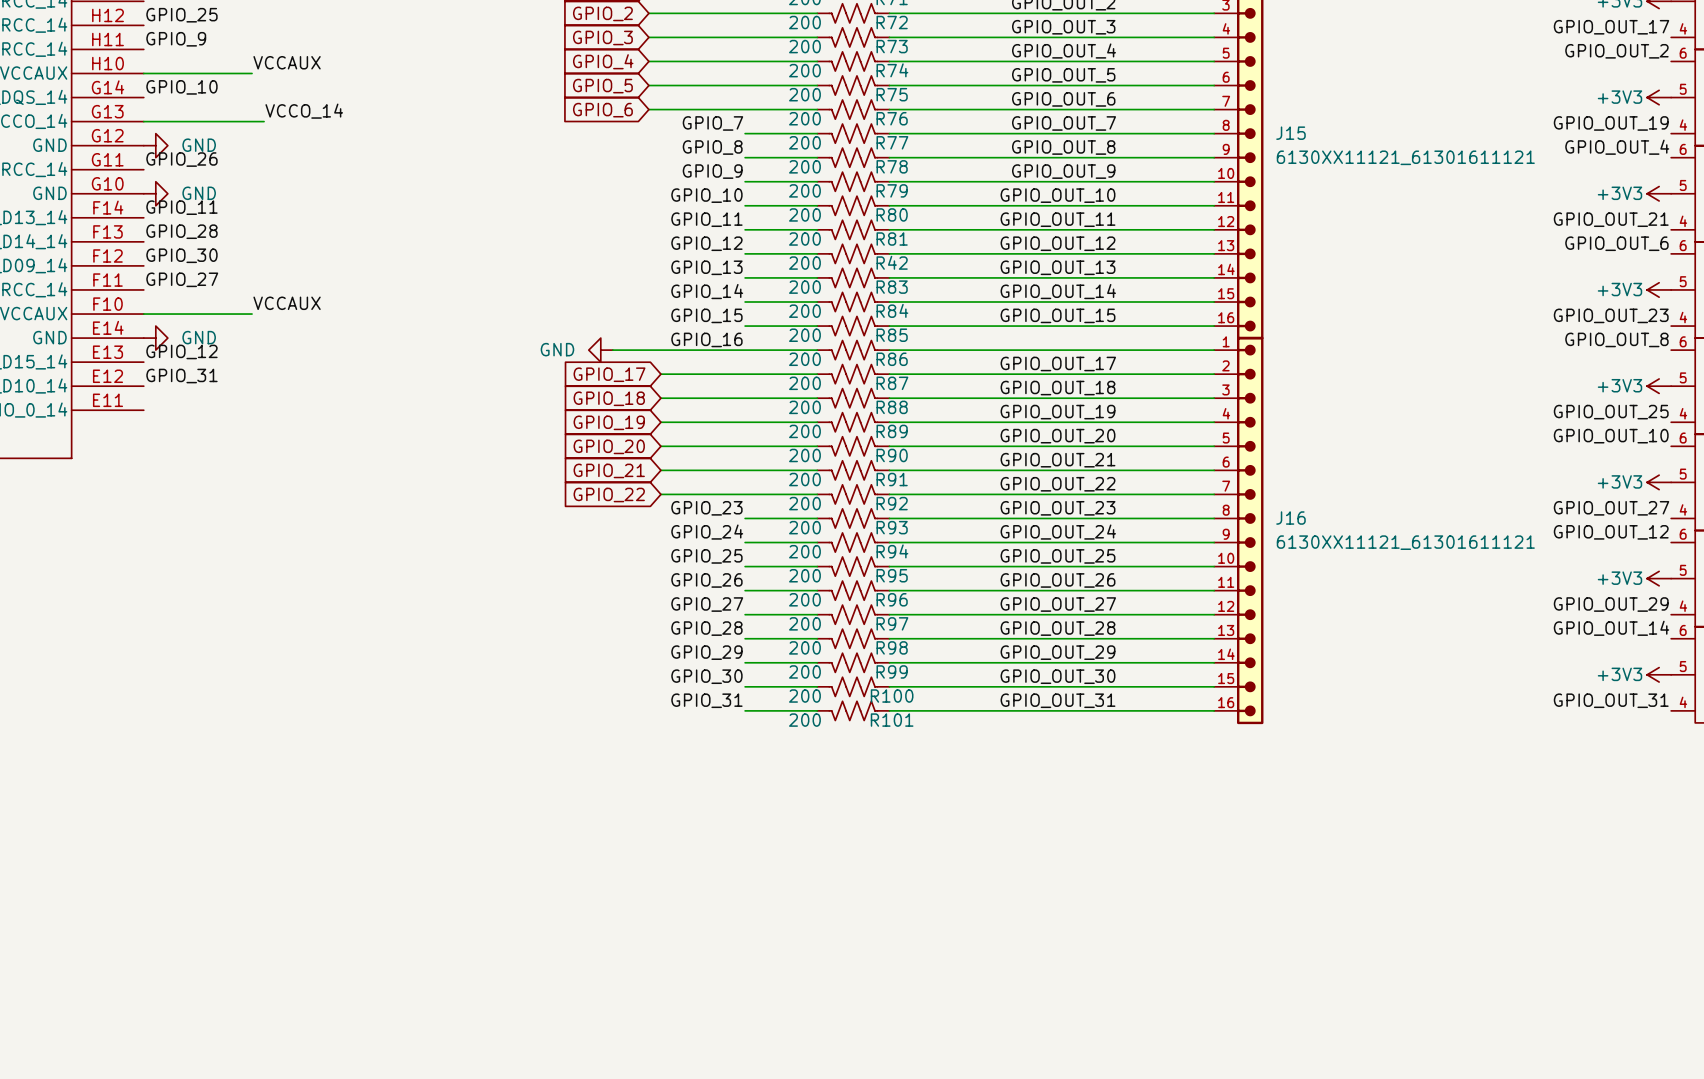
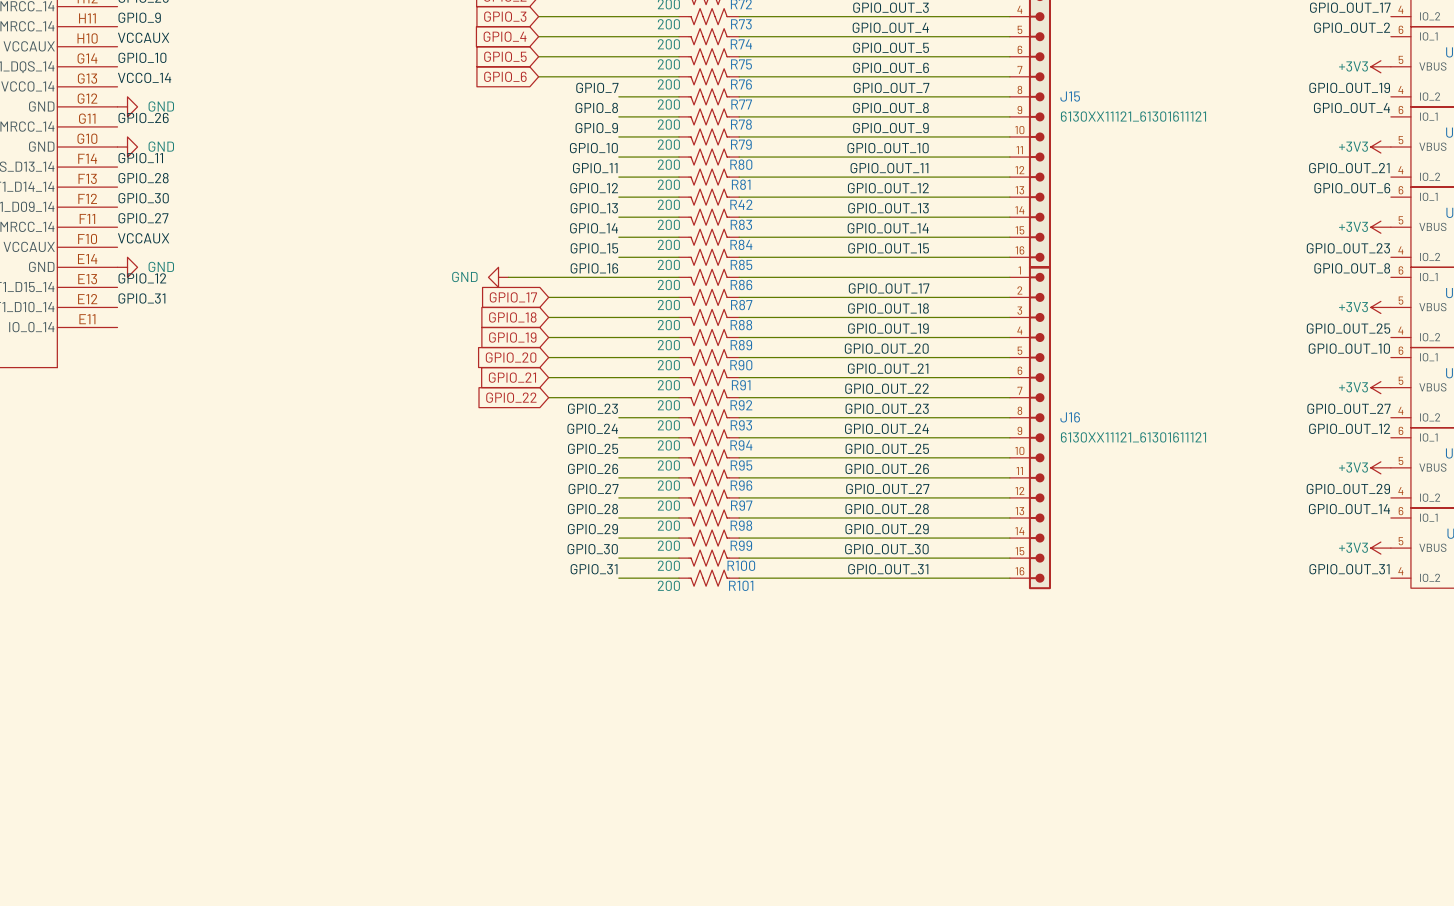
label position: VCCAUX (287, 62) -> VCCAUX (143, 37)
wire: (143, 73) (252, 73) -> none
label position: VCCO_14 (304, 111) -> VCCO_14 (144, 77)
wire: (143, 121) (264, 121) -> none
label position: VCCAUX (287, 303) -> VCCAUX (143, 238)
wire: (143, 314) (252, 314) -> none

